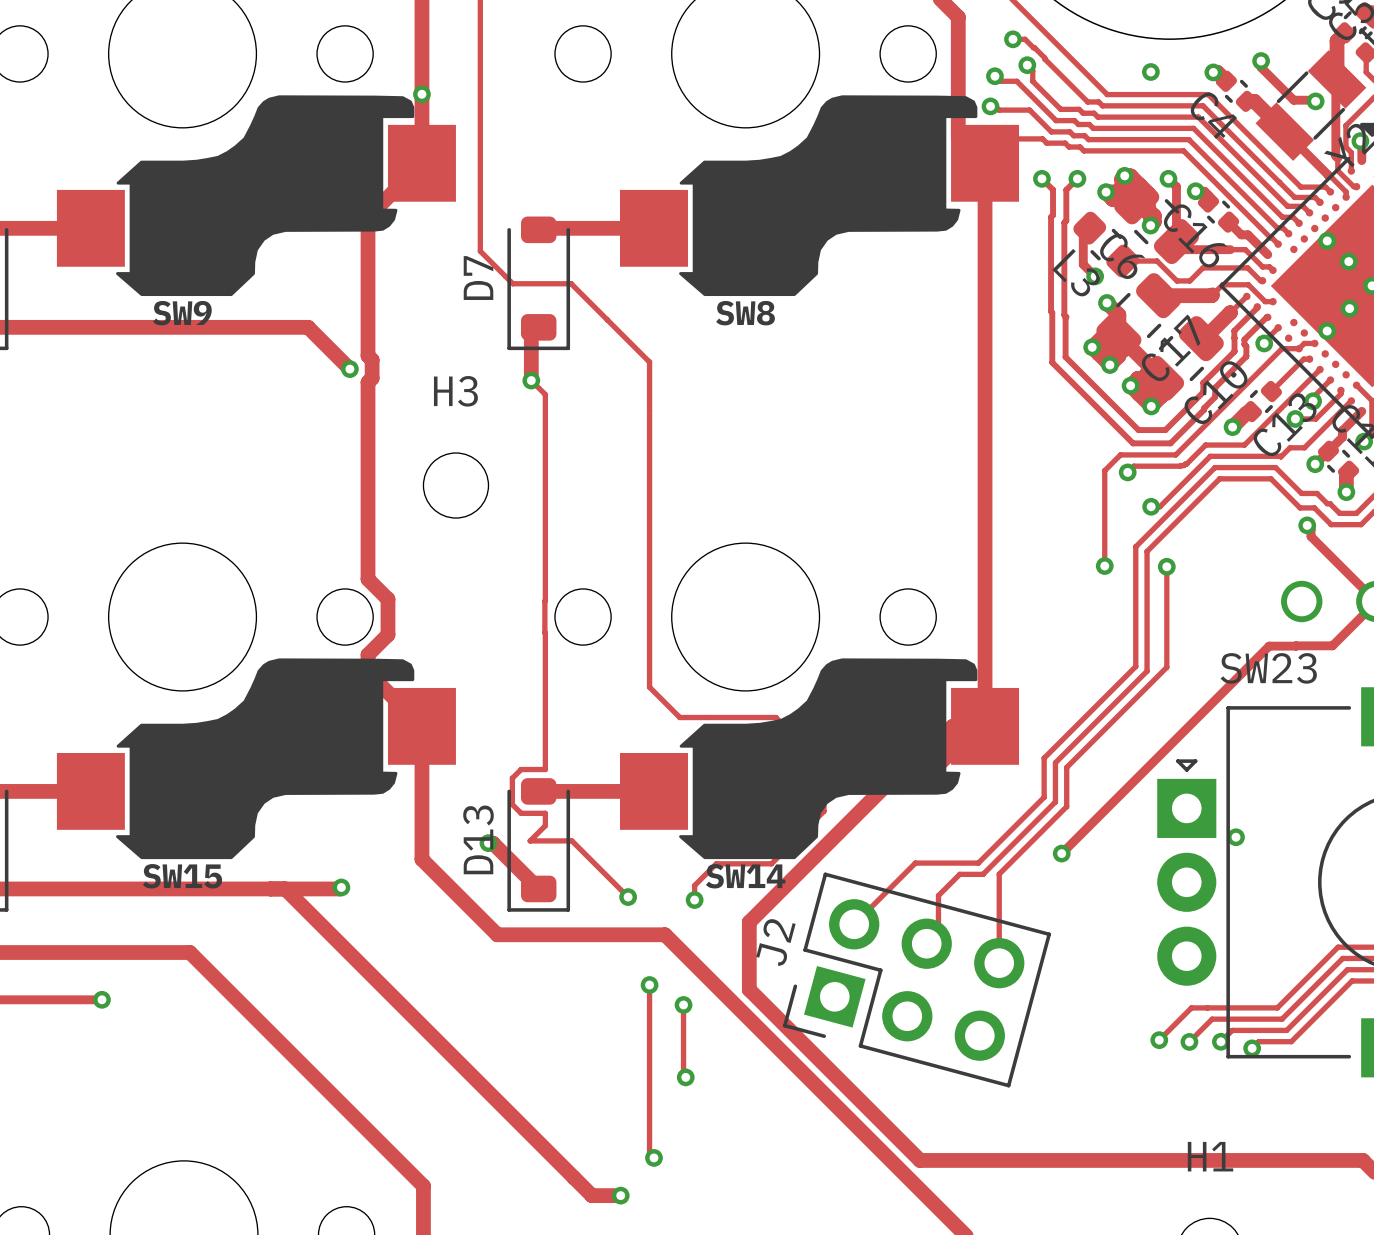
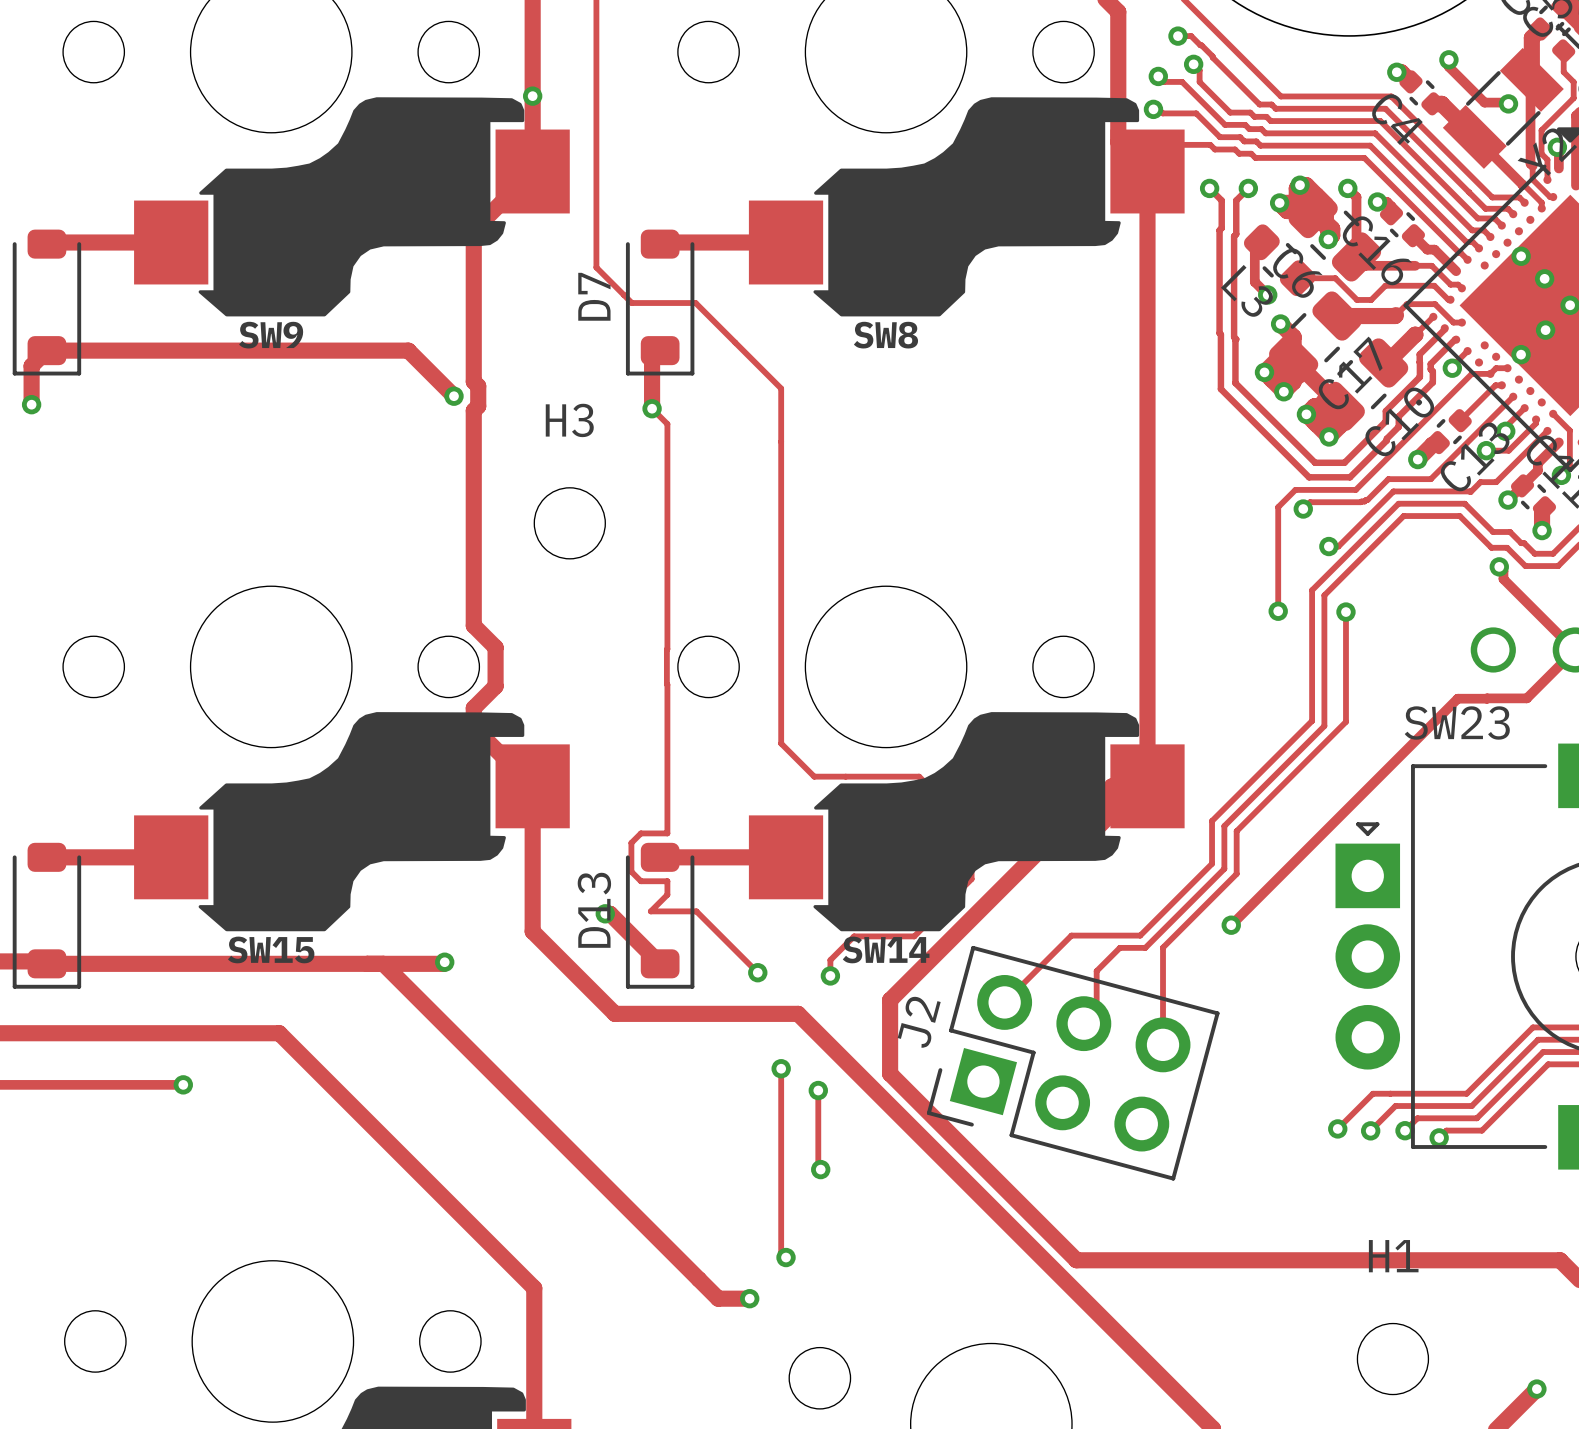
via: (1150, 71) -> none
via: (1236, 837) -> none

